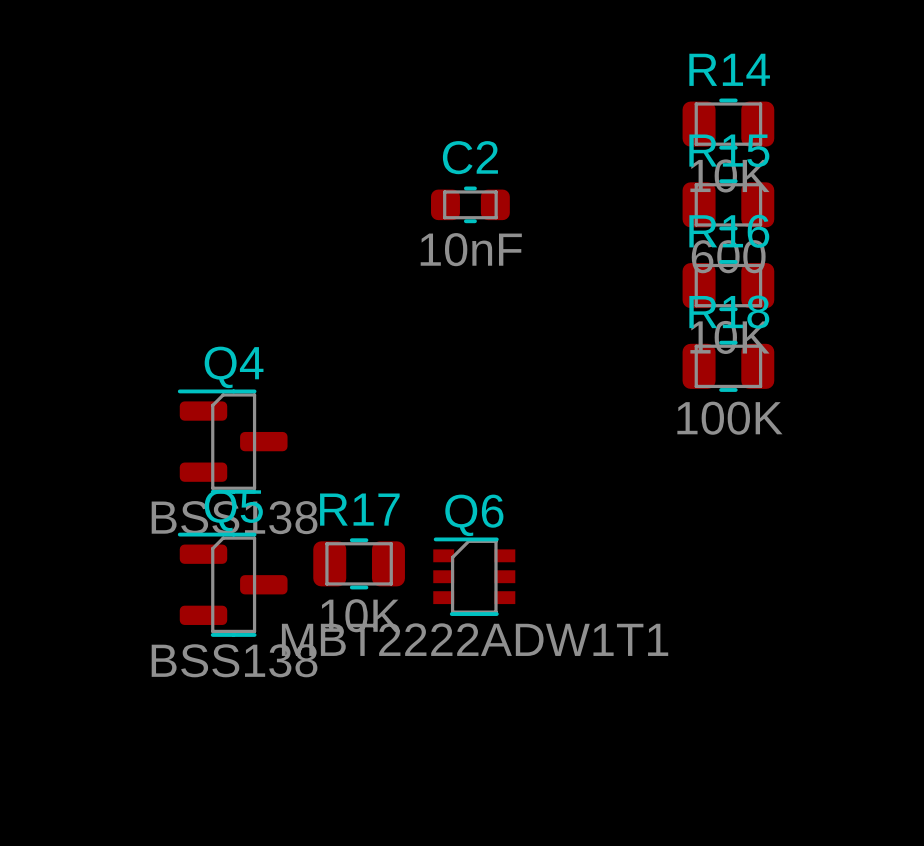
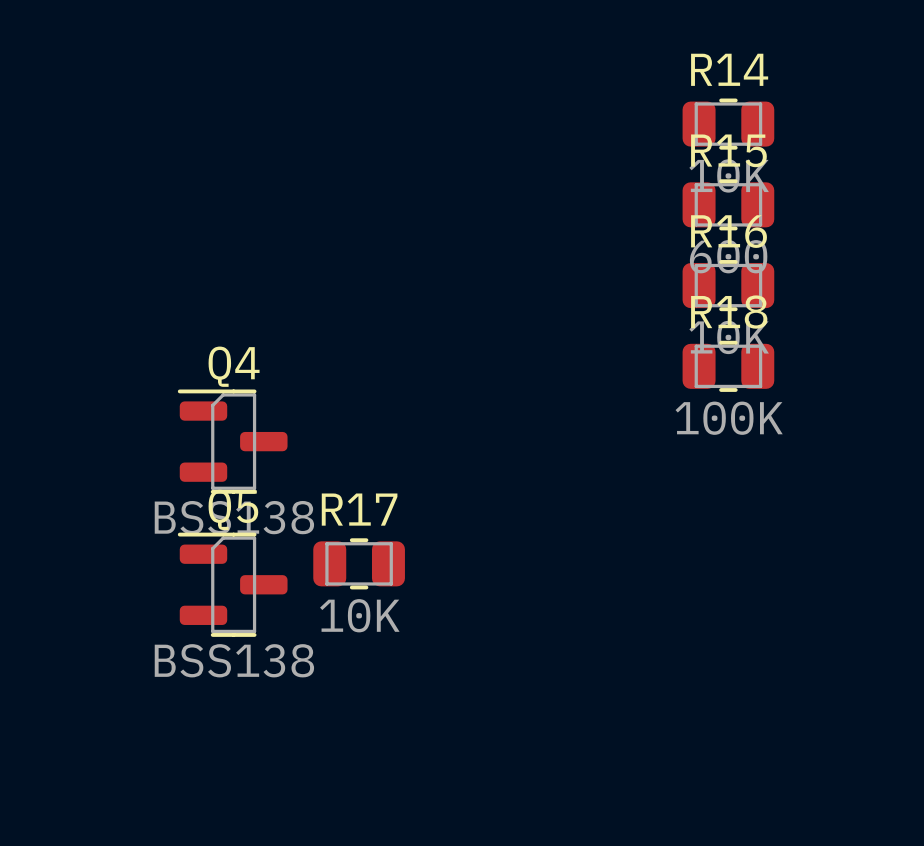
C2: 10nF (470, 204) -> none
Q6: MBT2222ADW1T1 (474, 576) -> none

